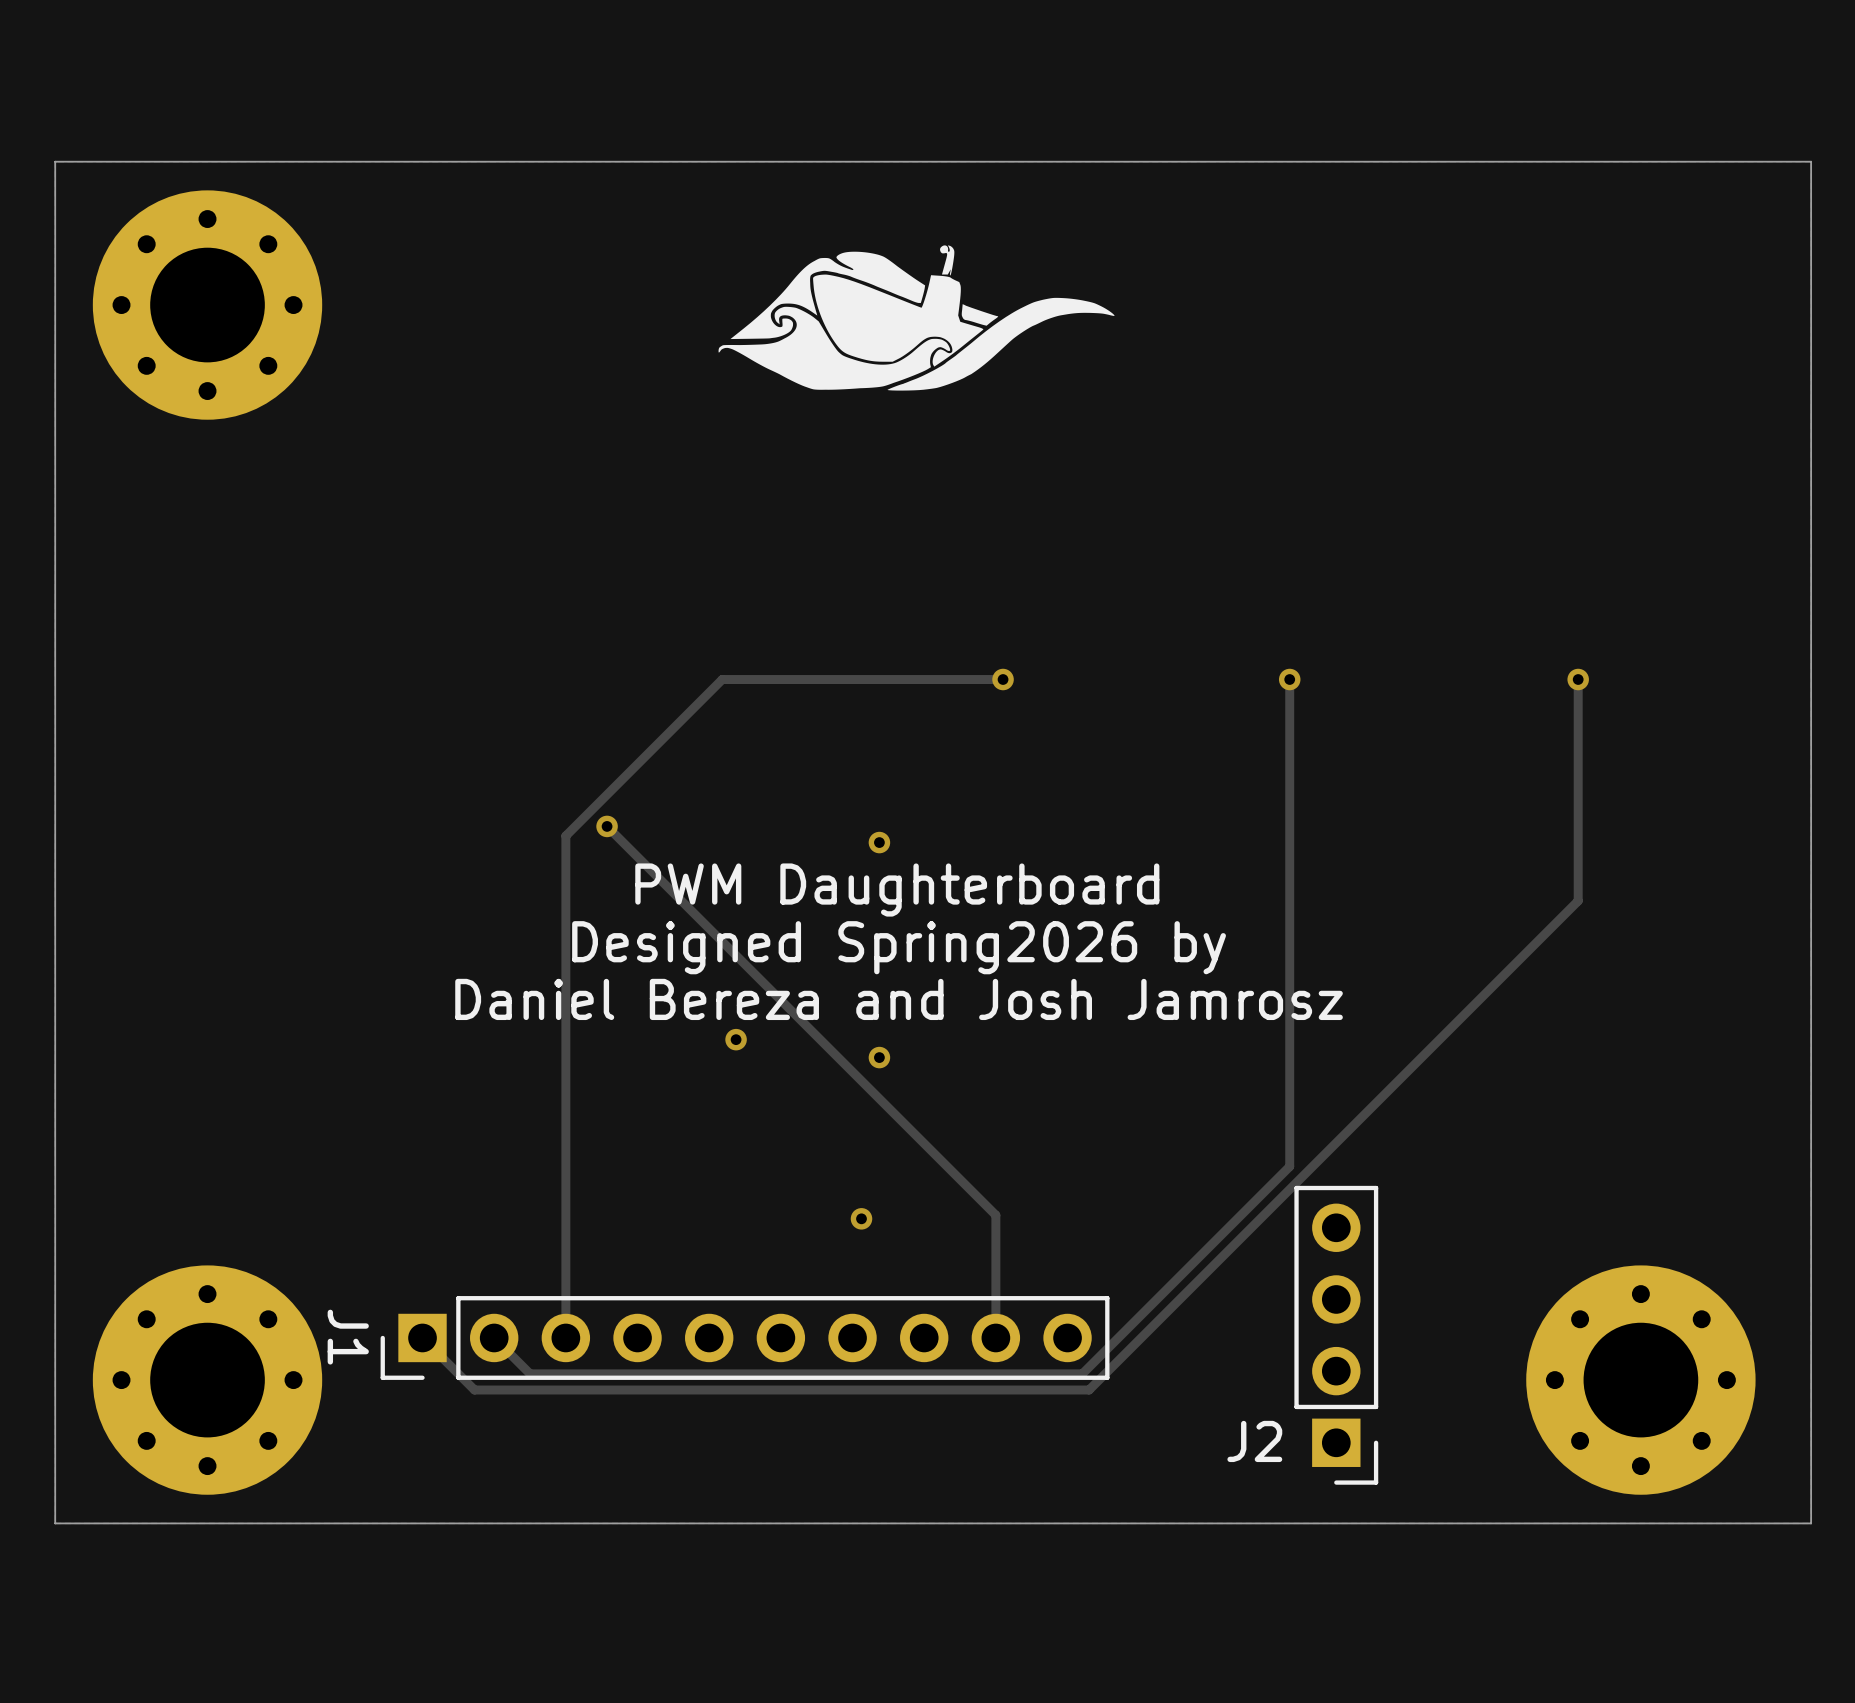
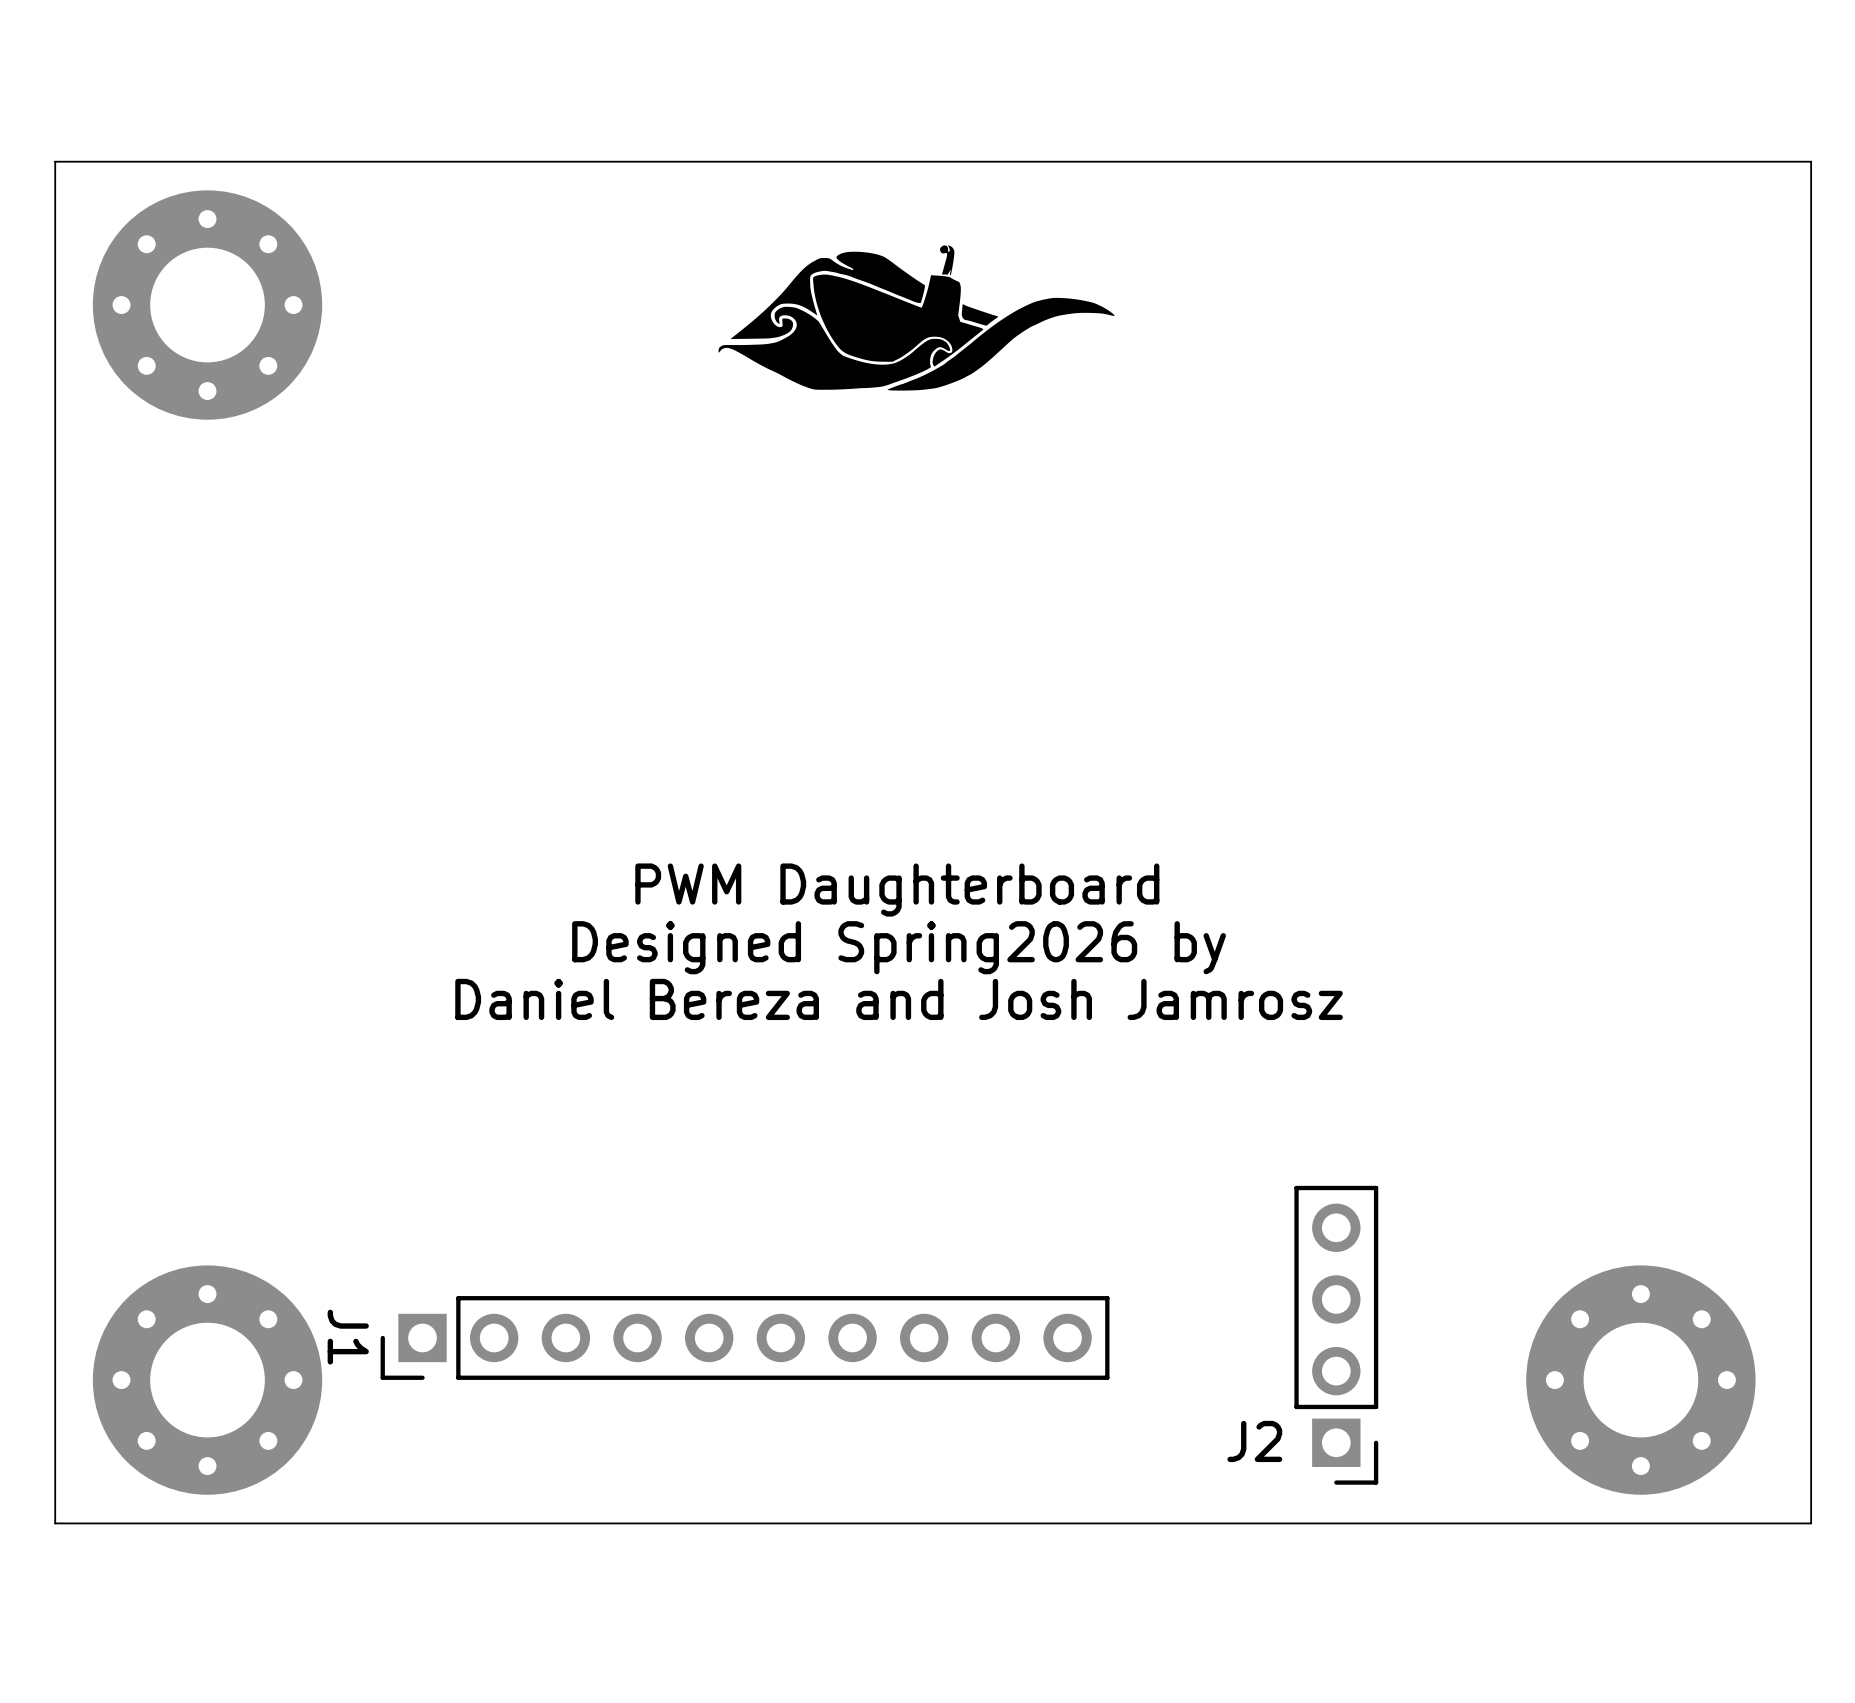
track: (1003, 679) (722, 679) (565, 835) (565, 1337) -> none
via: (1003, 679) -> none
track: (1289, 679) (1289, 1166) (1082, 1373) (530, 1373) (494, 1337) -> none
via: (1289, 679) -> none
track: (1578, 679) (1578, 900) (1089, 1390) (474, 1390) (422, 1337) -> none
via: (1578, 679) -> none
track: (607, 826) (995, 1215) (995, 1337) -> none
via: (607, 826) -> none
via: (879, 842) -> none
via: (736, 1039) -> none
via: (879, 1057) -> none
via: (861, 1218) -> none

